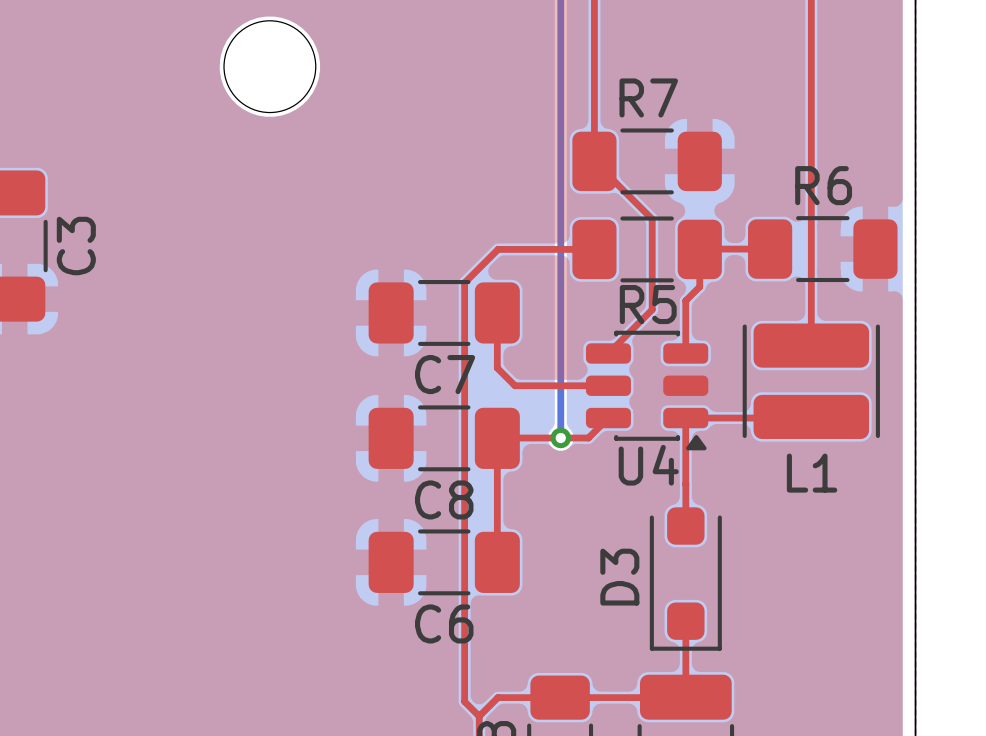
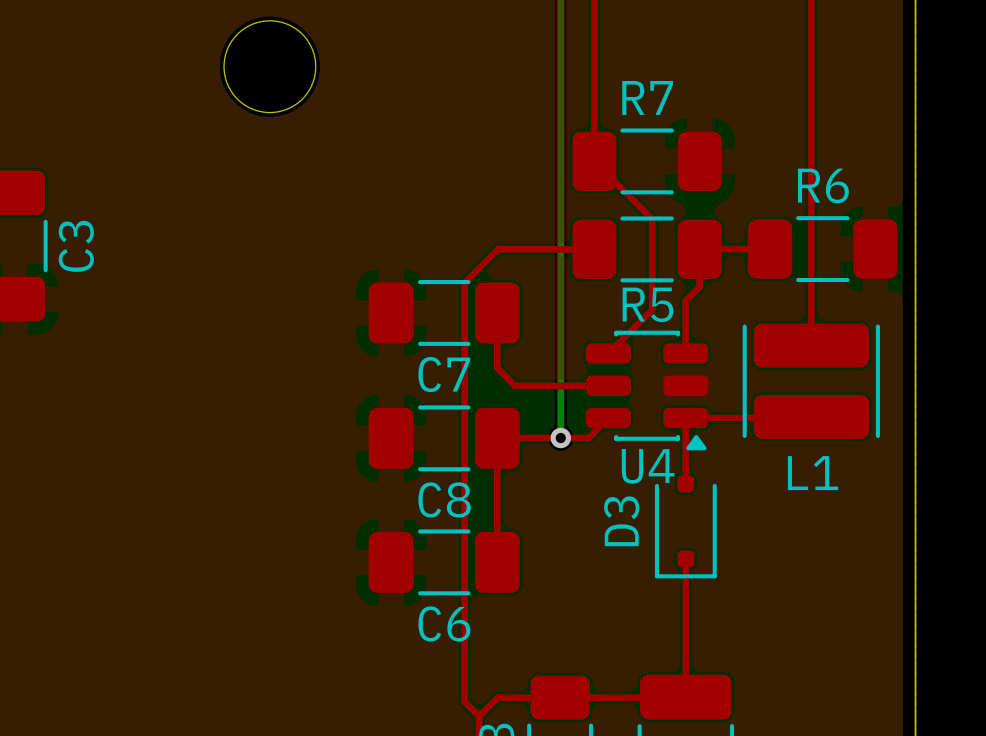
D3 footprint: [649, 507, 722, 651] -> [654, 475, 717, 579]
top track: none -> (685, 558) (685, 621)

